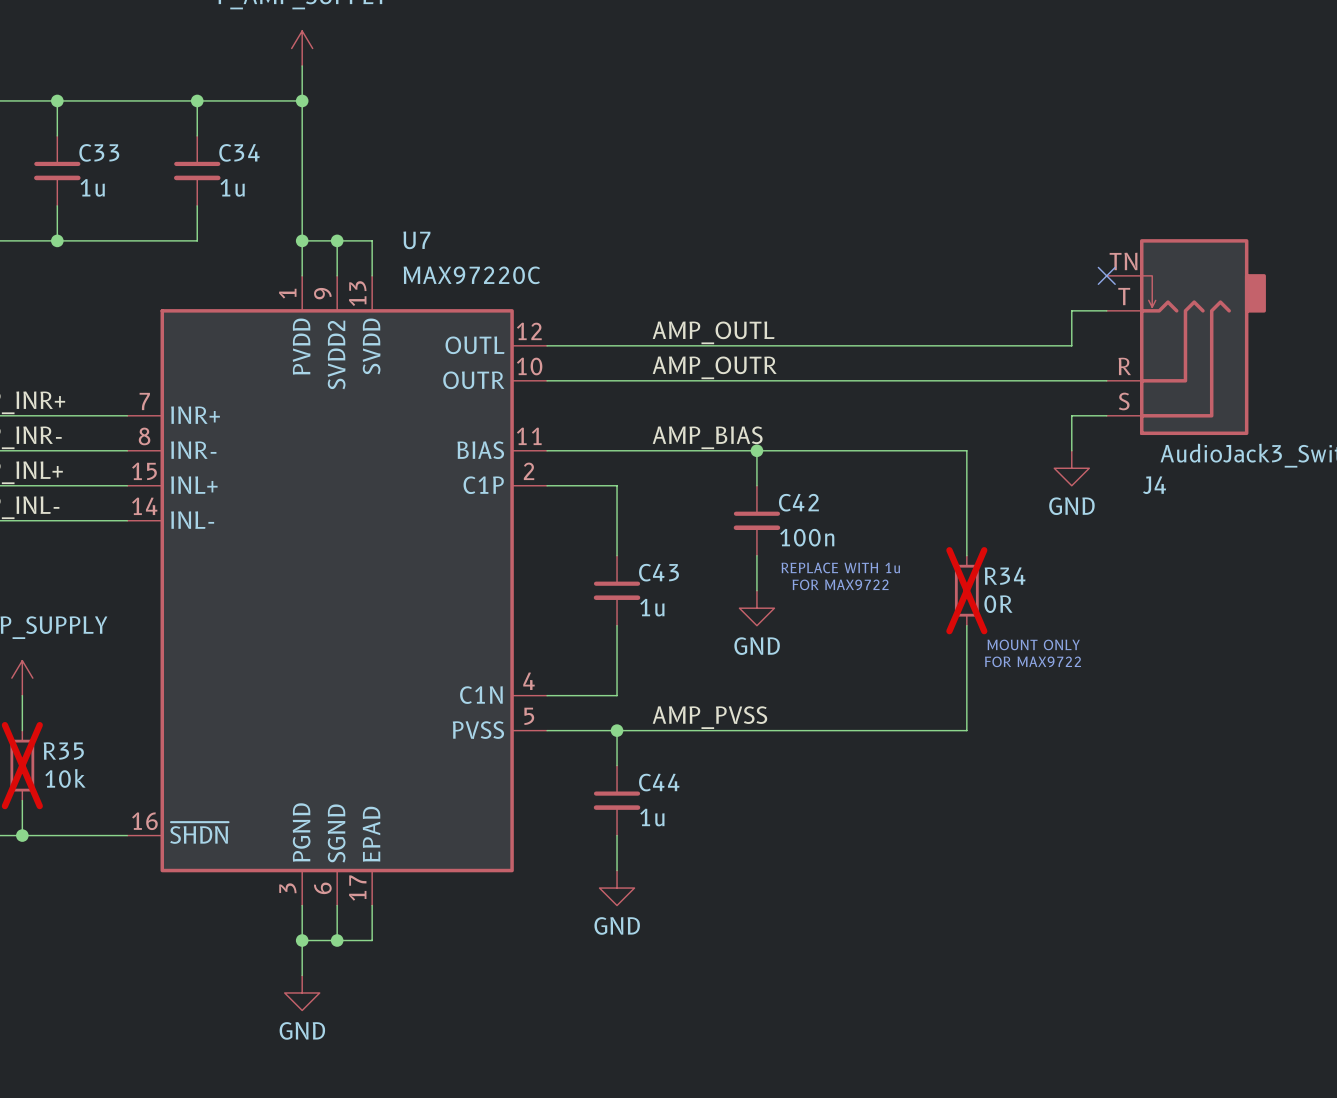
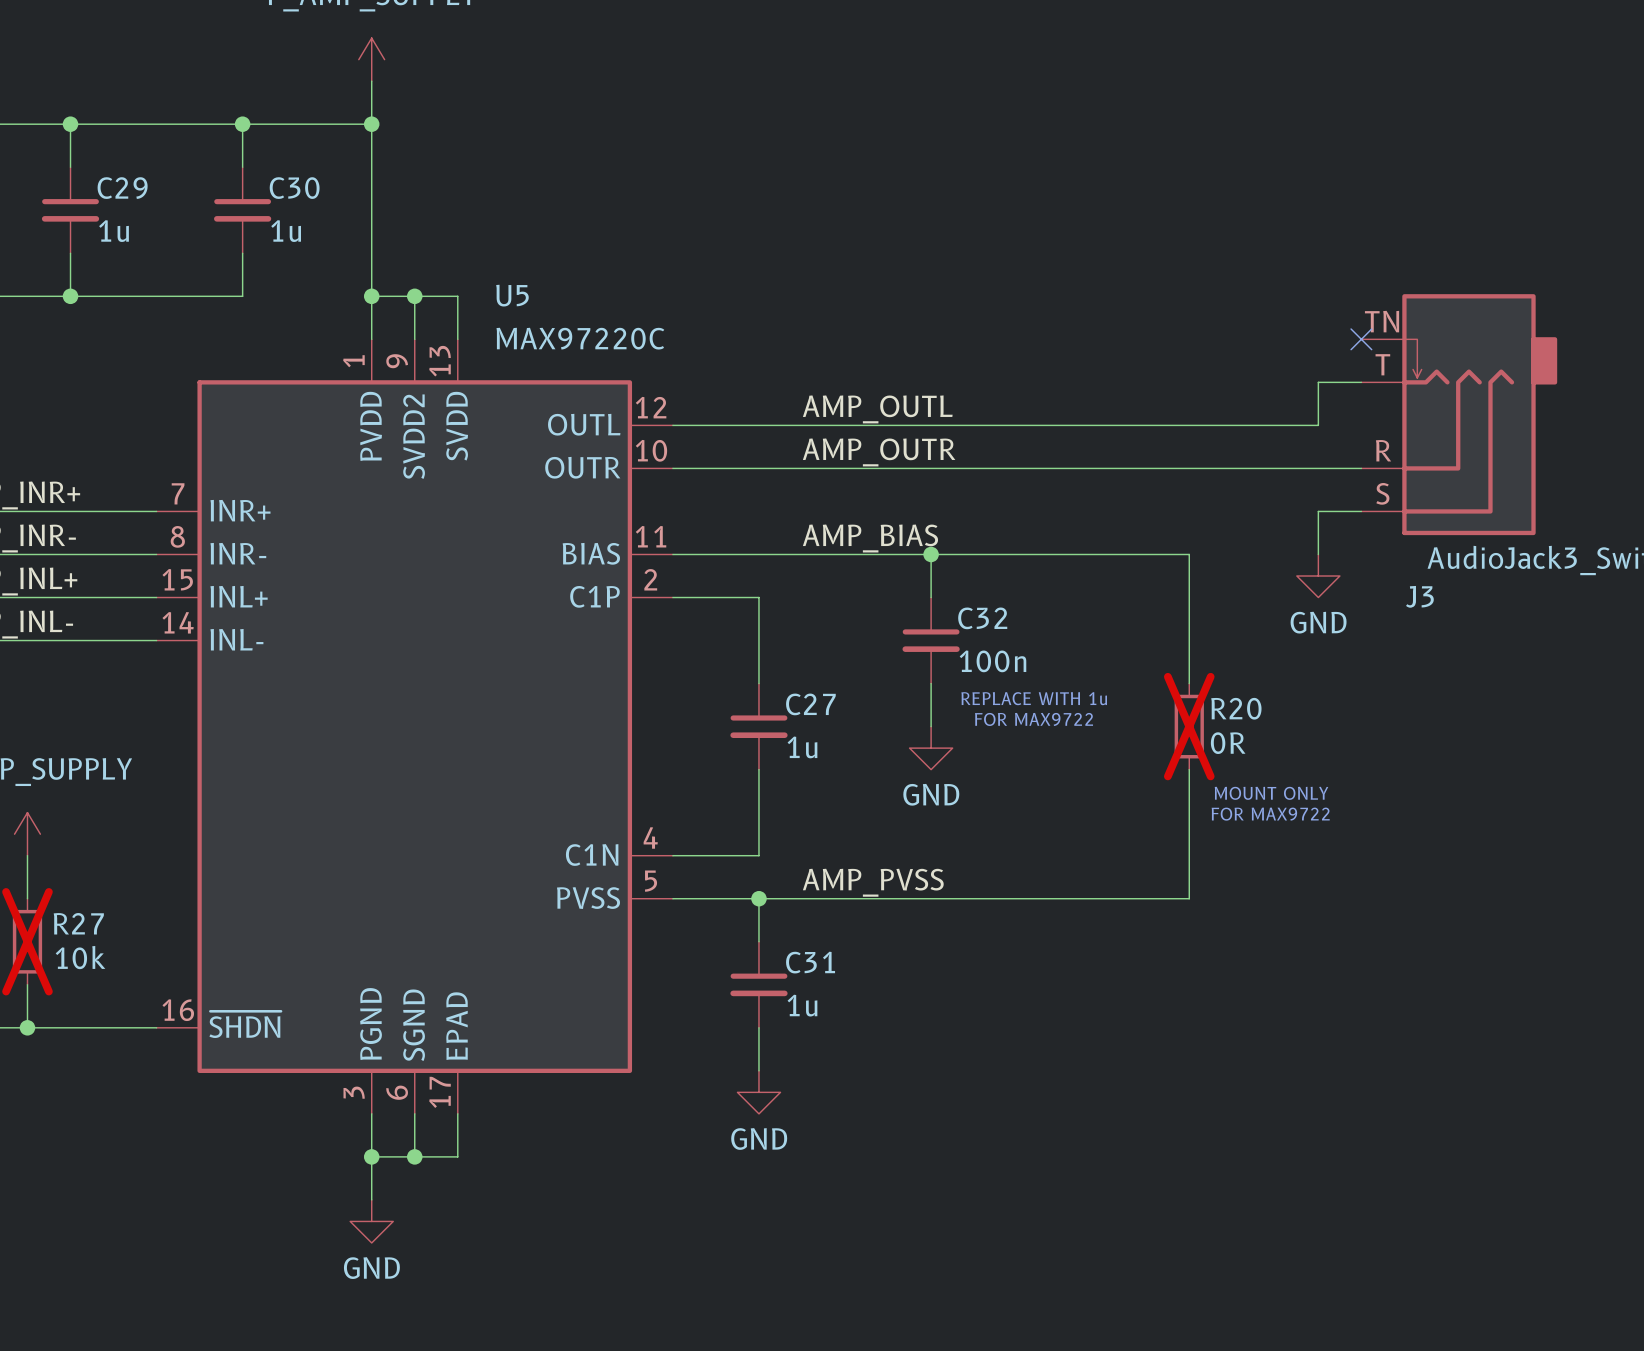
C33 name: C33 (99, 152) -> C29 (122, 188)
C34 name: C34 (239, 152) -> C30 (294, 188)
U7 name: U7 (416, 240) -> U5 (512, 295)
J4 name: J4 (1154, 485) -> J3 (1419, 596)
C42 name: C42 (798, 502) -> C32 (982, 618)
C43 name: C43 (658, 572) -> C27 (810, 704)
R34 name: R34 (1005, 576) -> R20 (1236, 708)
R35 name: R35 (63, 751) -> R27 (78, 923)
C44 name: C44 (659, 782) -> C31 (810, 962)

